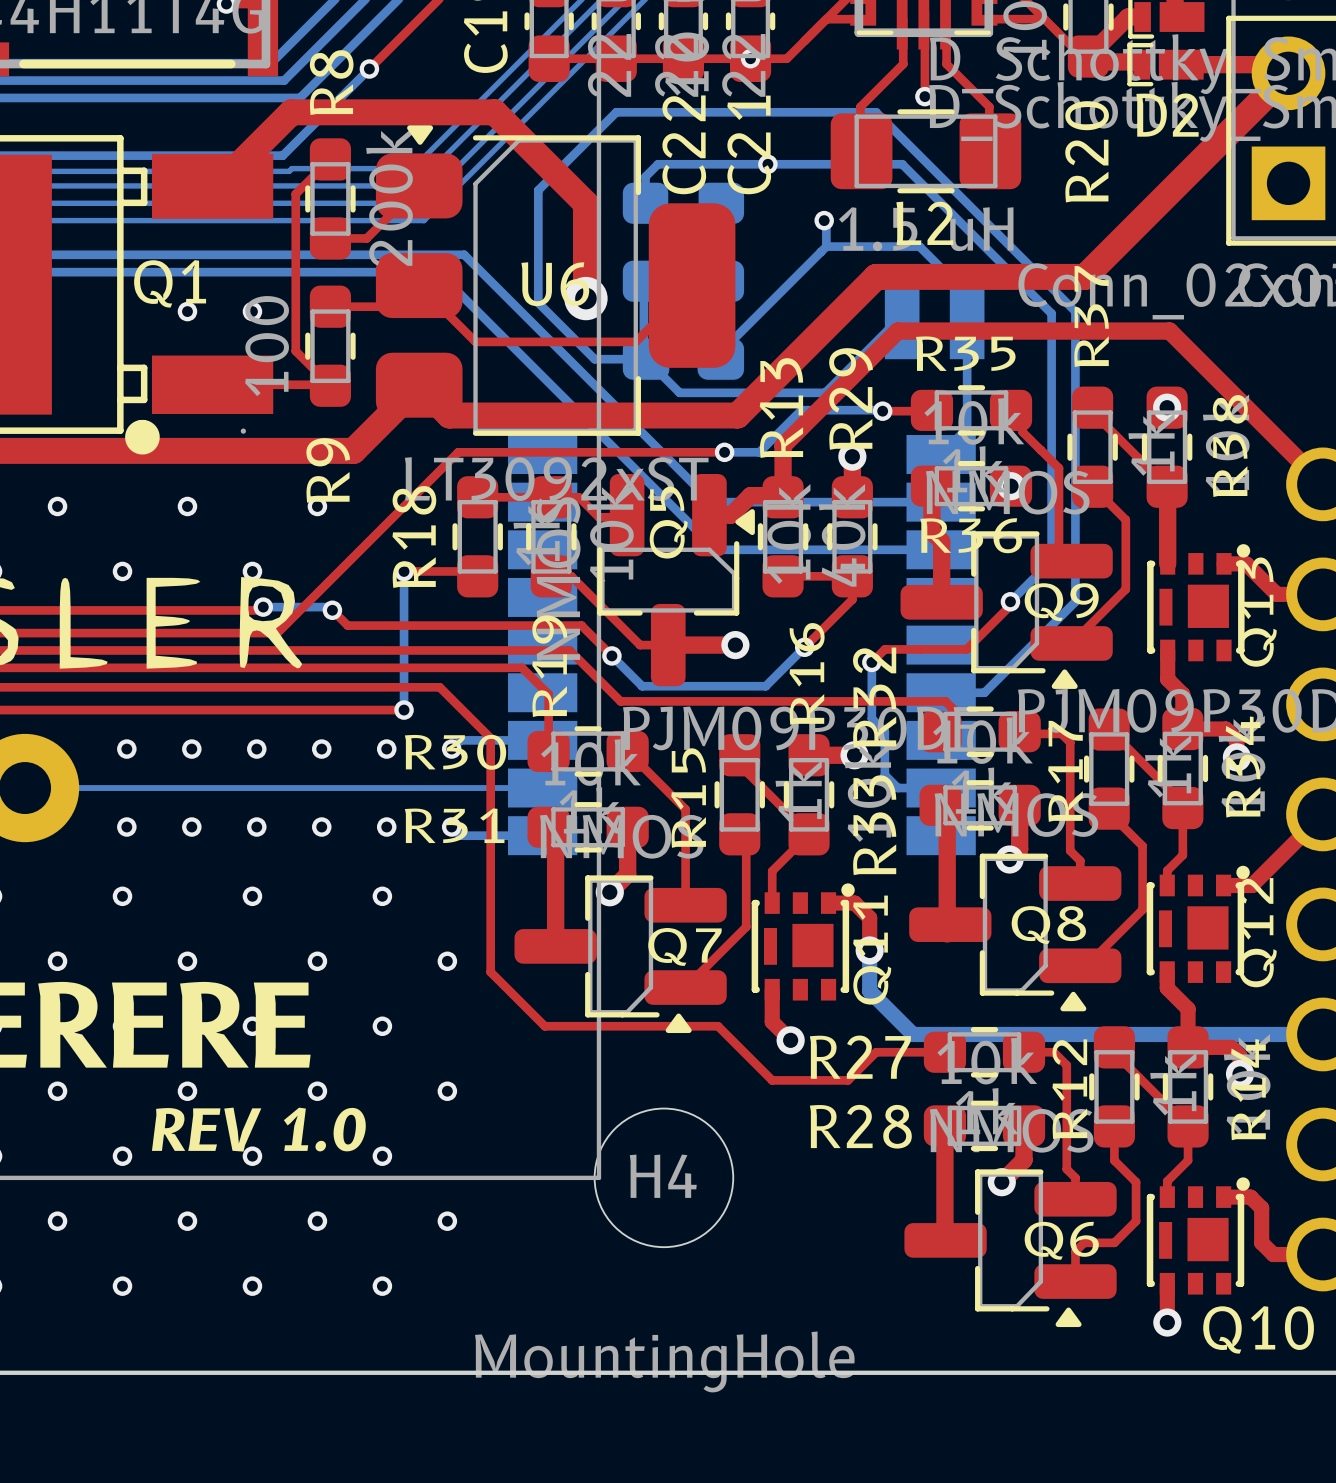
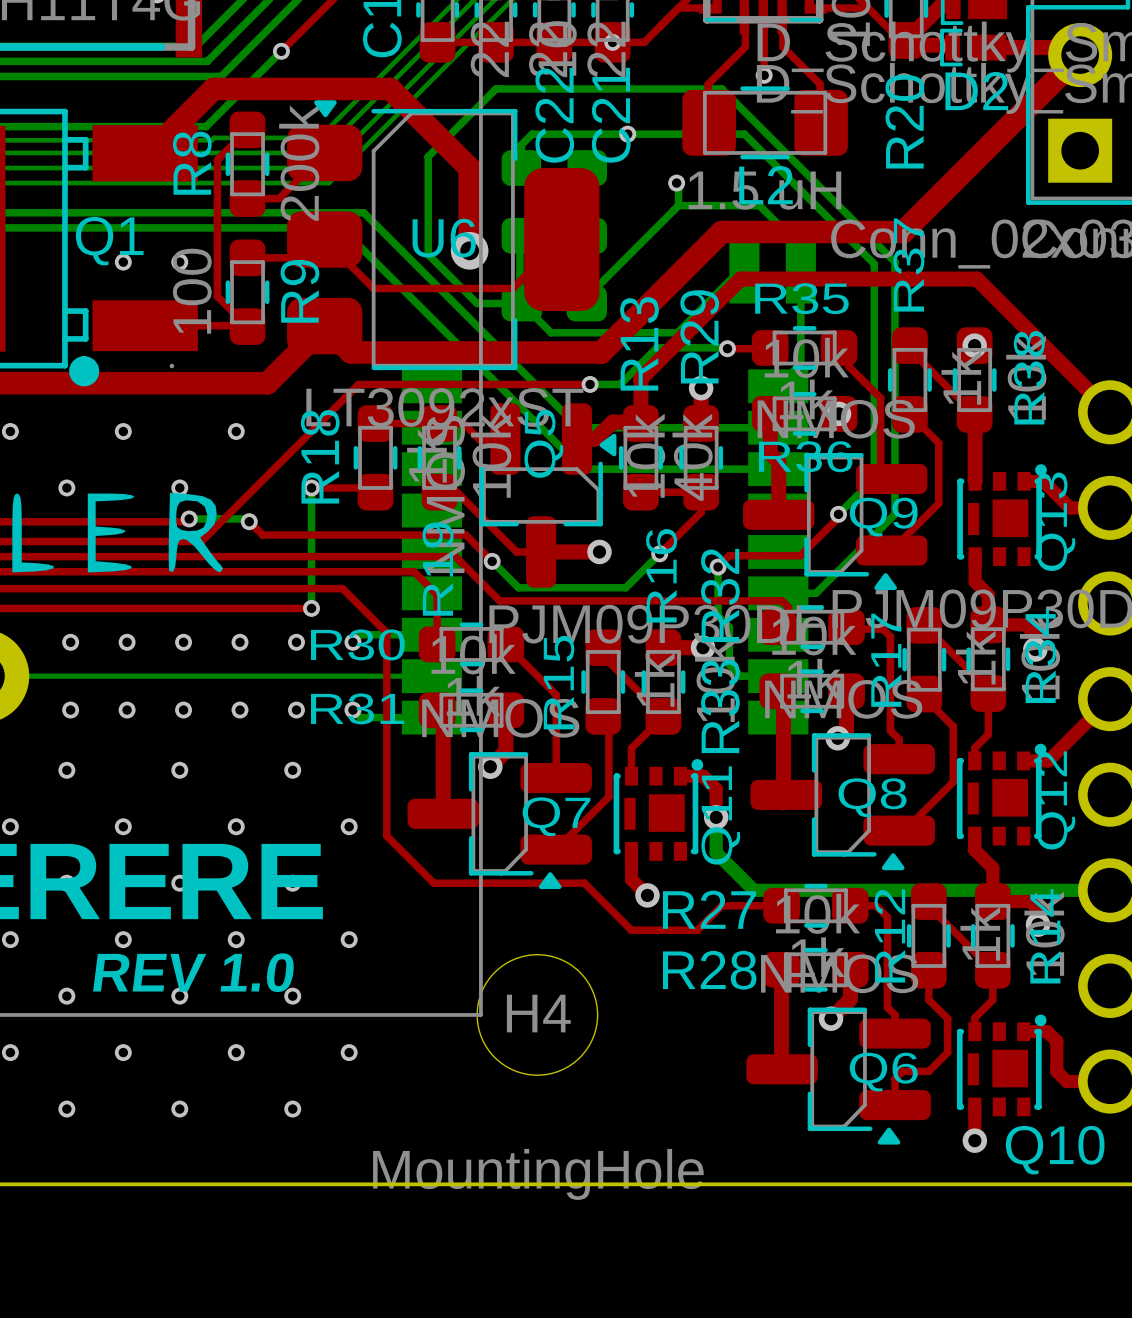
R8 name position: R8 (331, 82) -> R8 (192, 163)
R9 name position: R9 (328, 470) -> R9 (299, 291)

